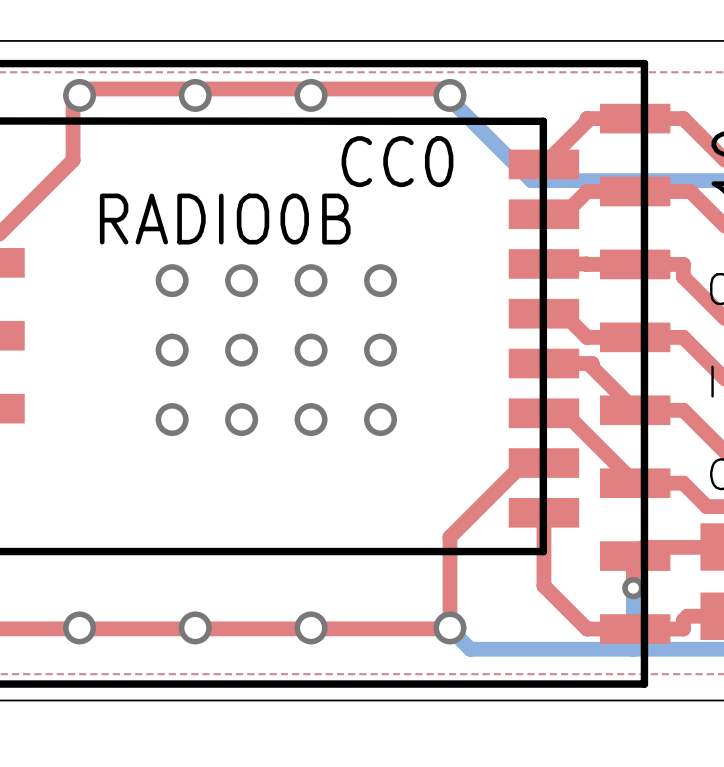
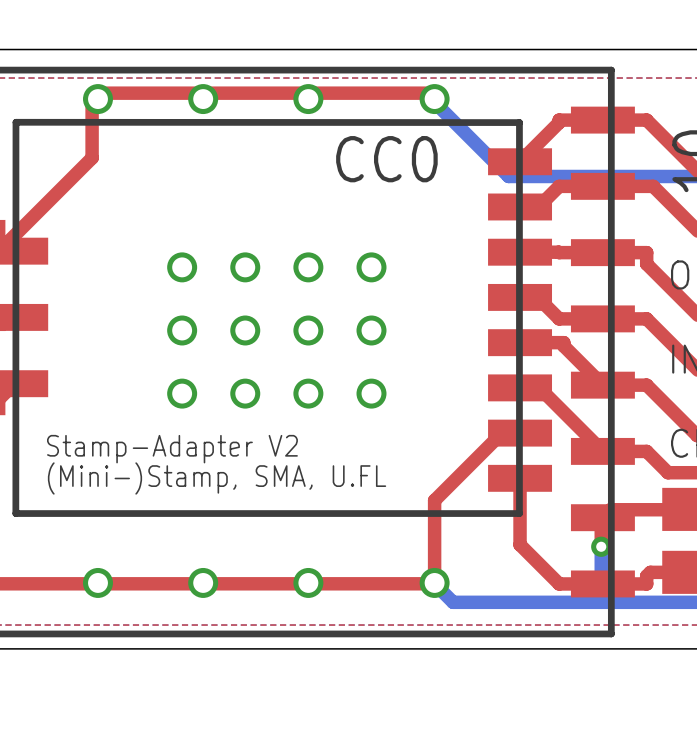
RADIO0B name: RADIO0B (225, 219) -> none
text: none -> Stamp-Adapter V2 (172, 449)
text: none -> (Mini-)Stamp, SMA, U.FL (217, 478)

